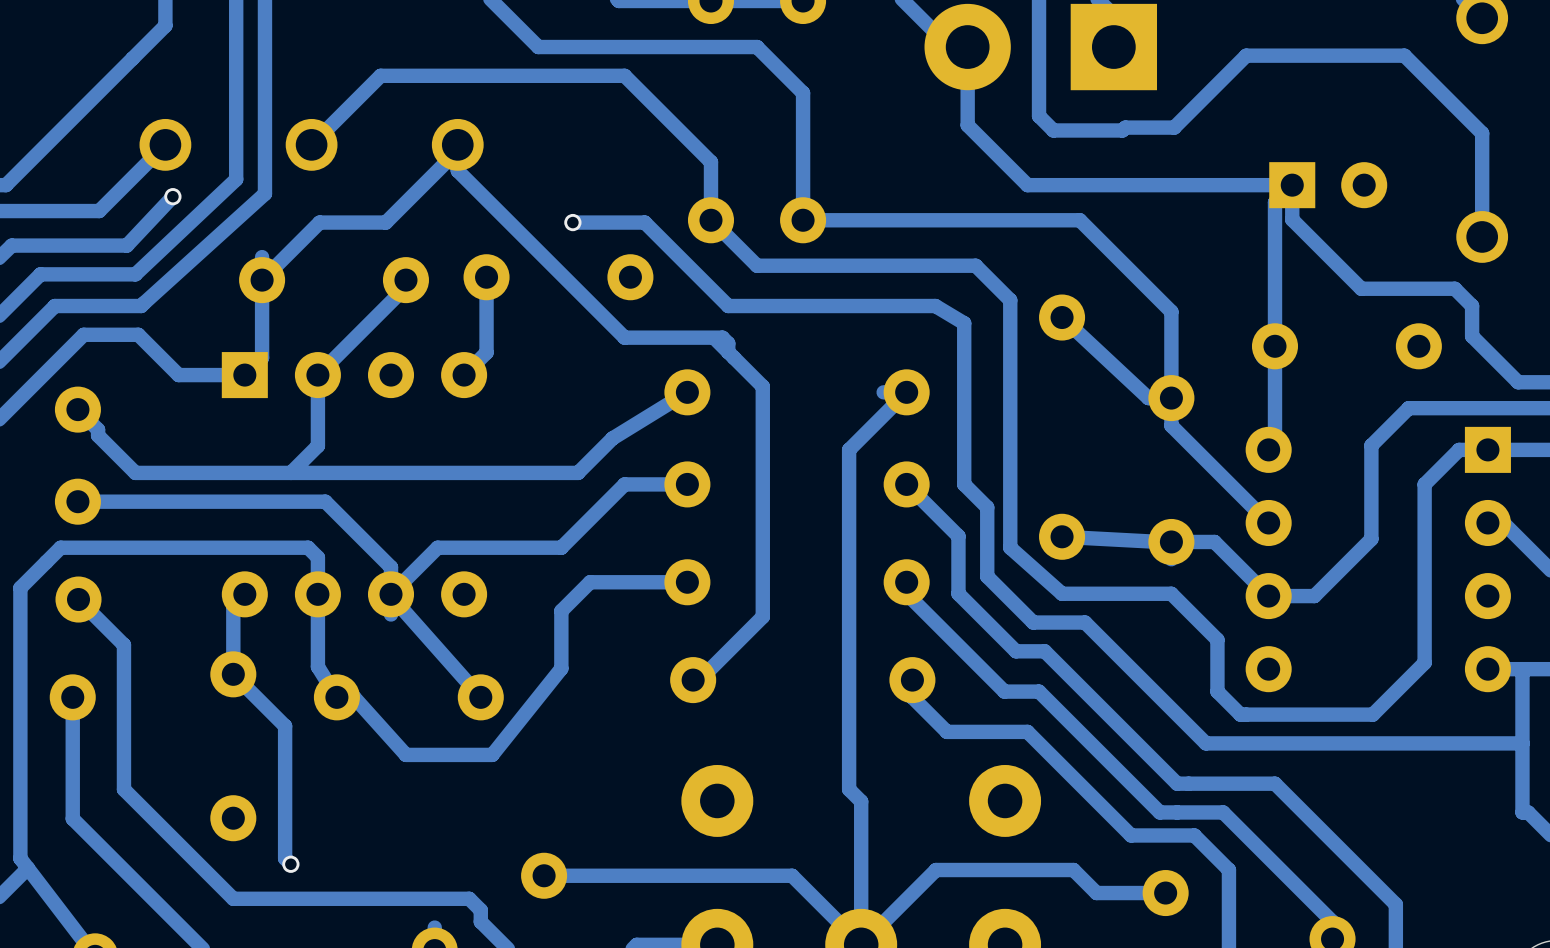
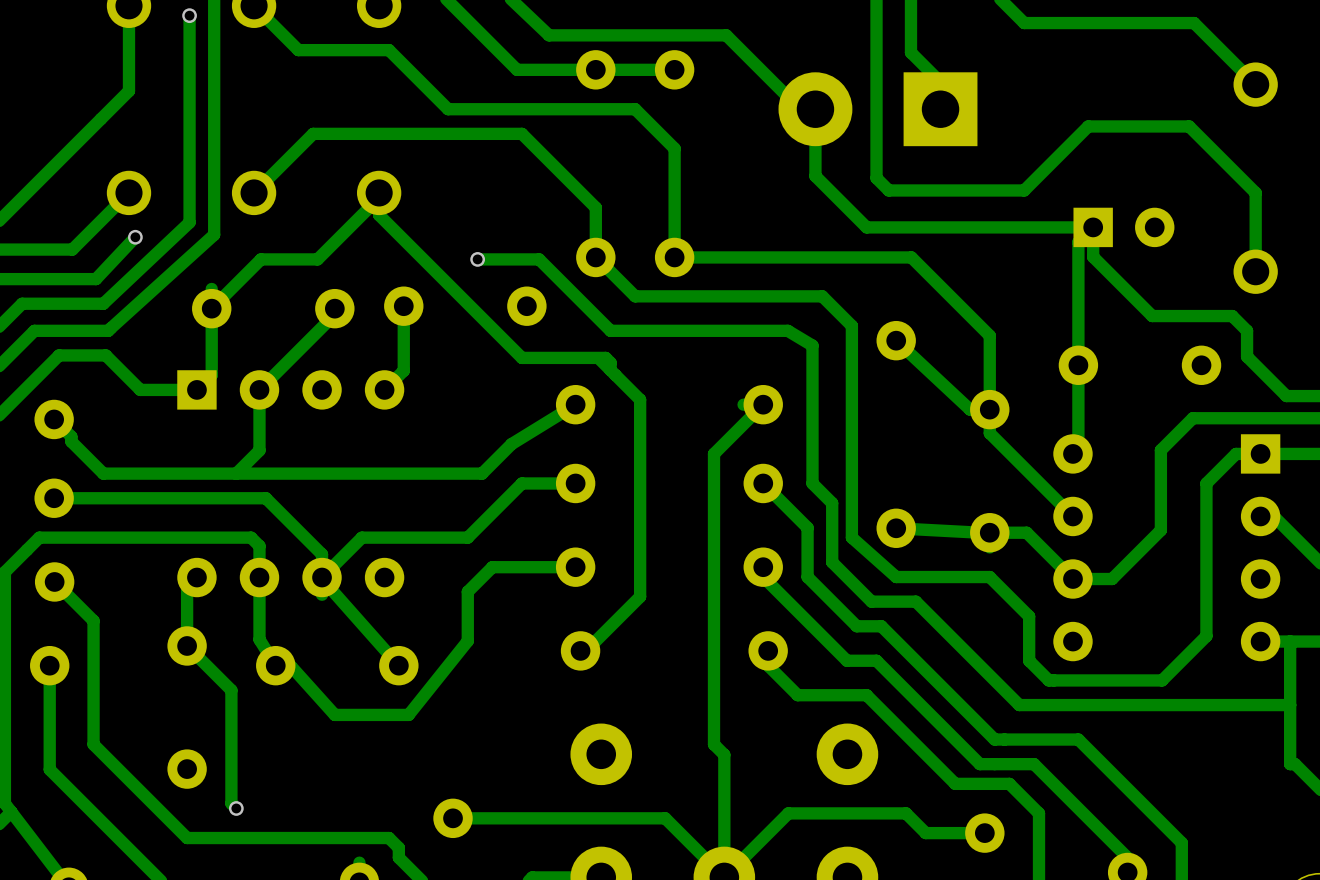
track: (1039, 116) (1053, 130) (1122, 130) (1125, 127) (1174, 127) (1246, 55) (1404, 55) (1482, 133) (1482, 144) -> (876, 168) (876, 178) (888, 190) (1024, 190) (1088, 126) (1189, 126) (1255, 192)

